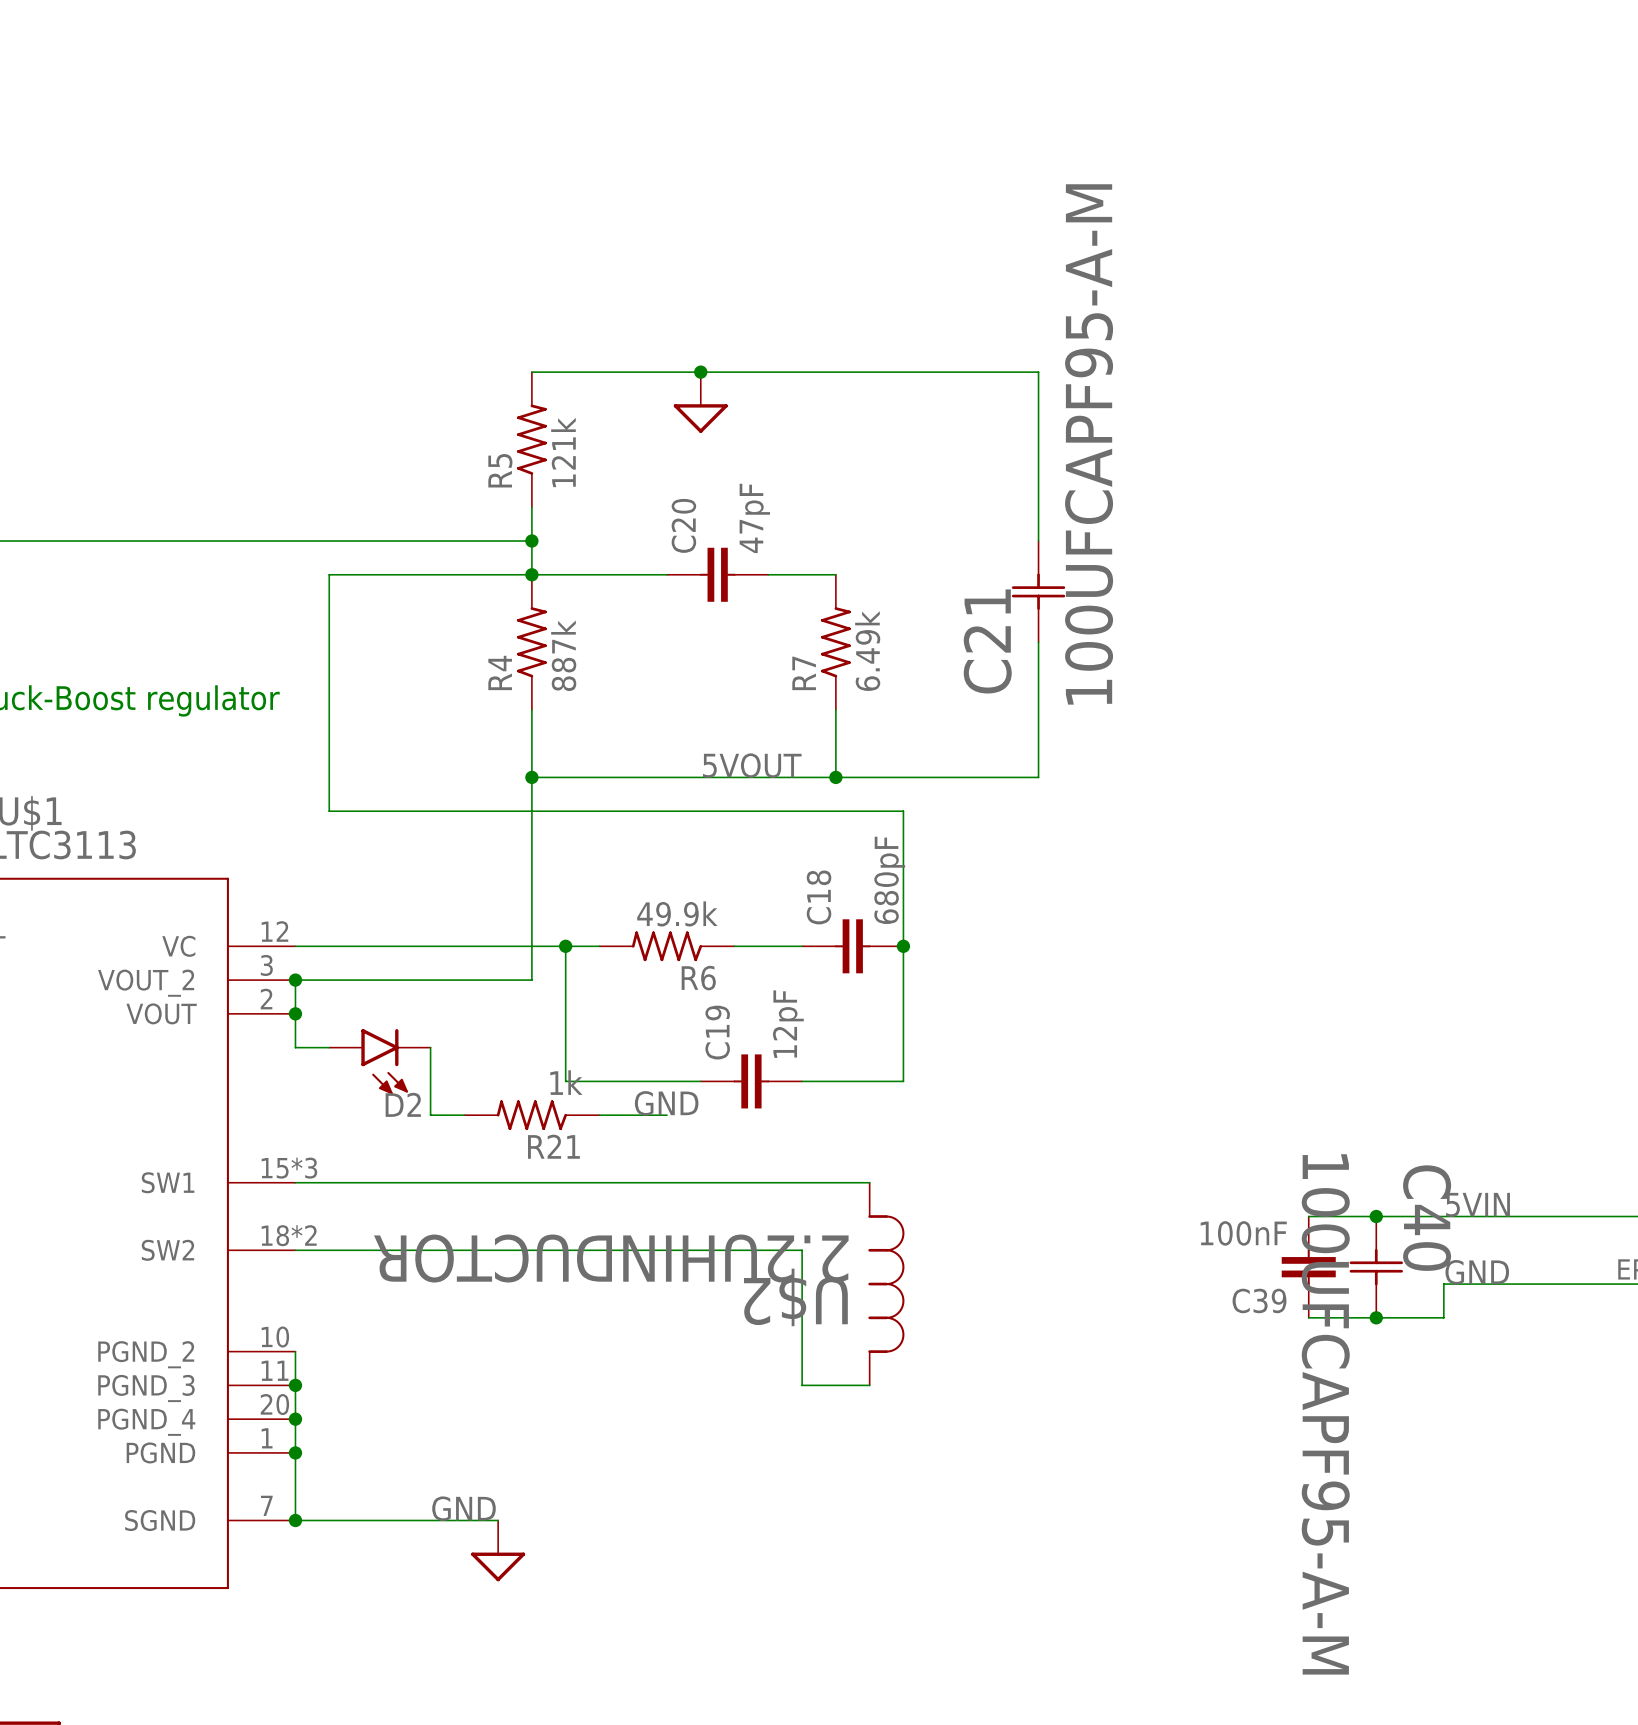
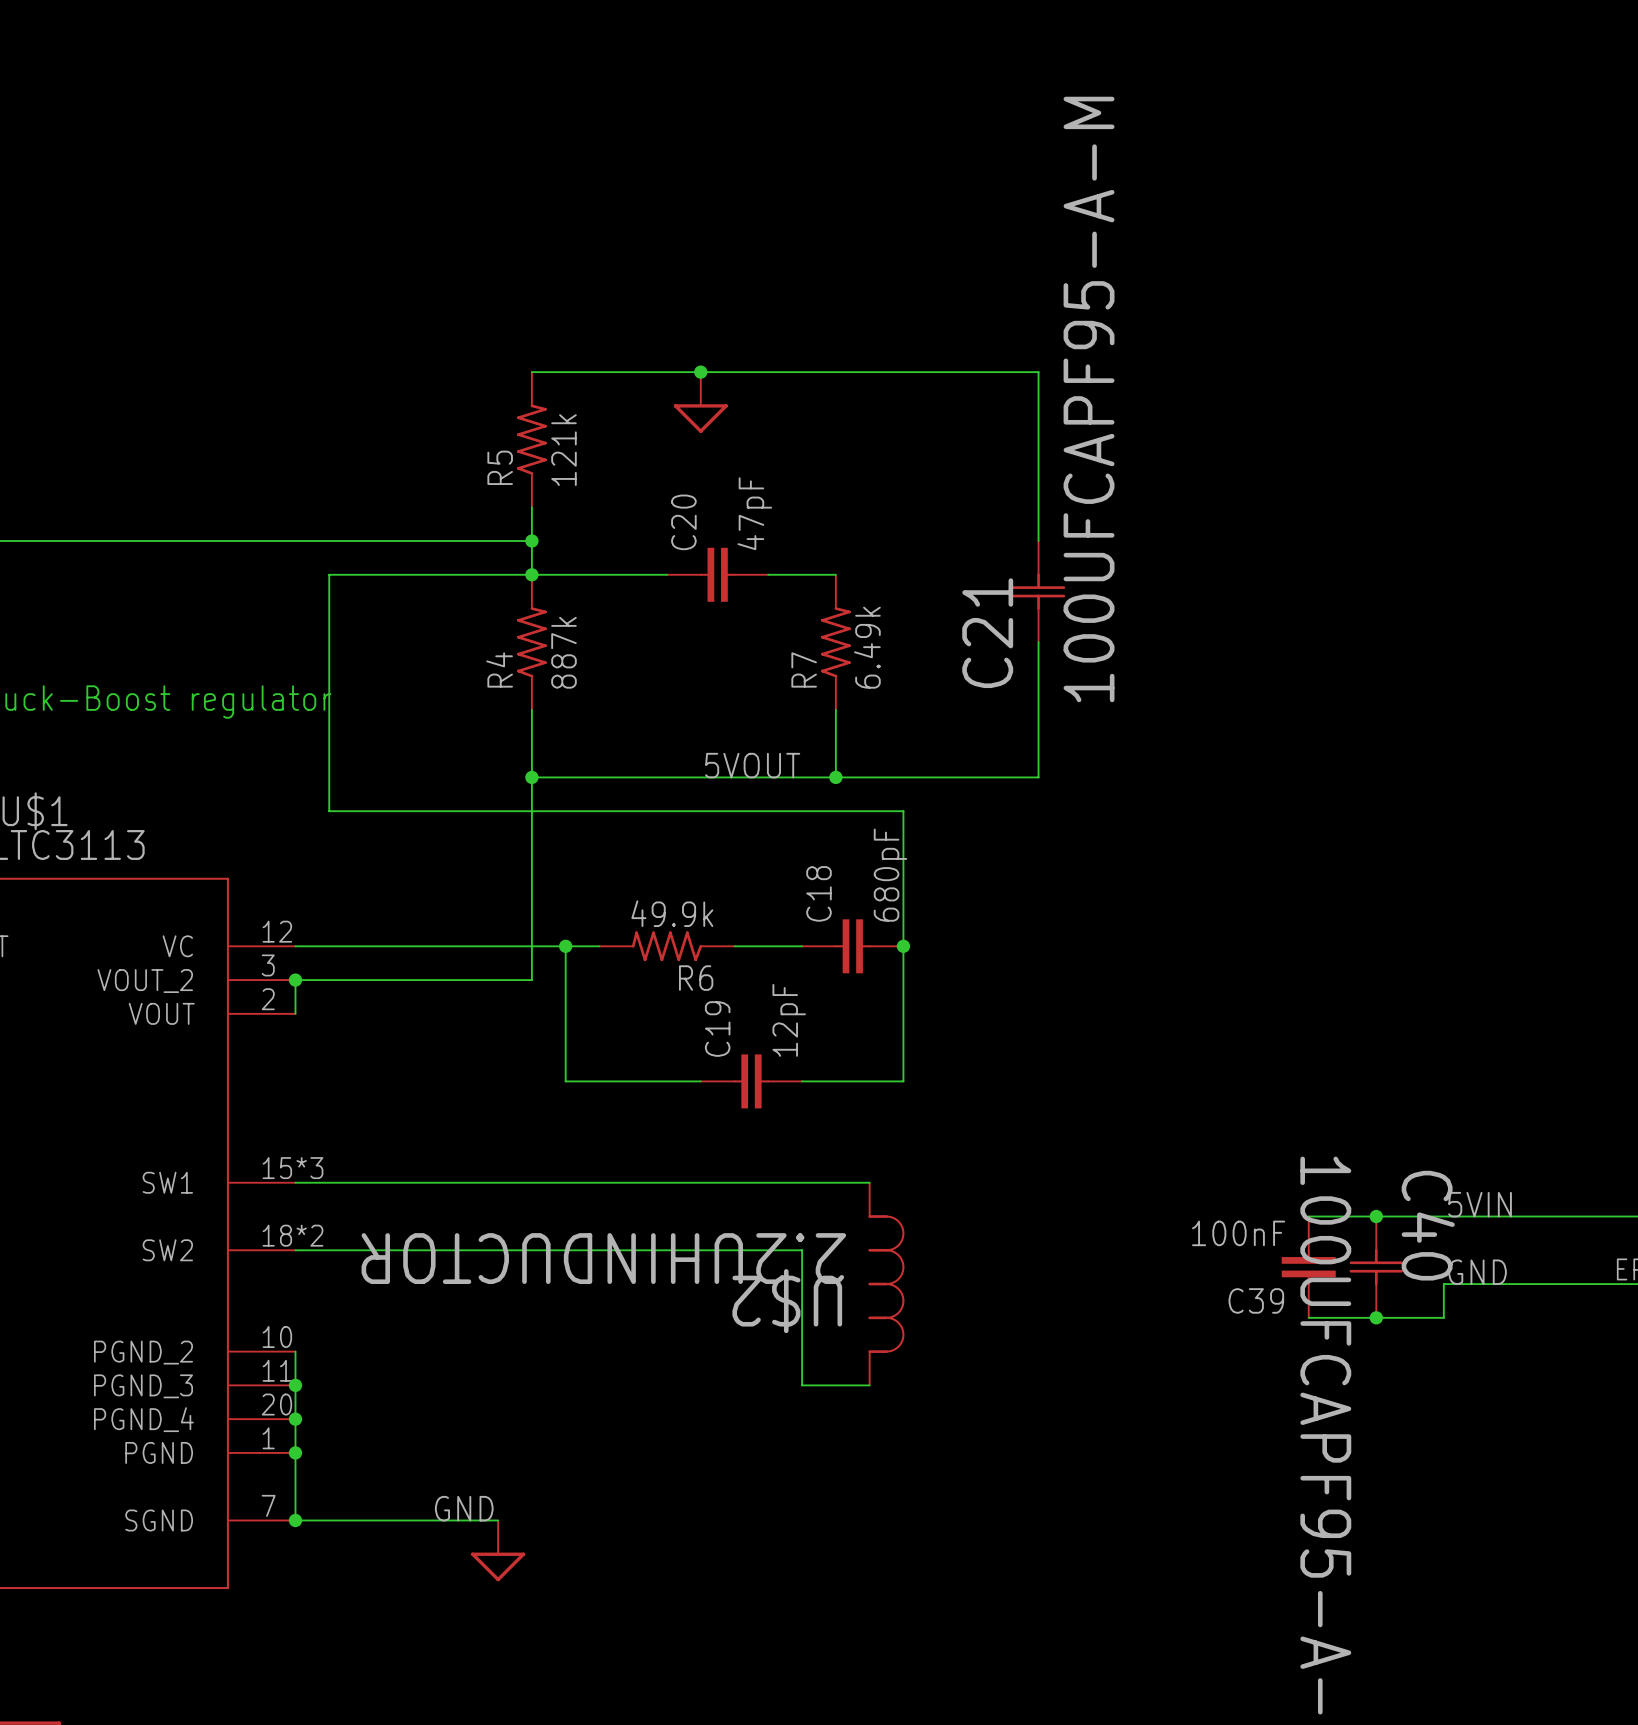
wire: (295, 1013) (295, 1047) (329, 1047) -> none
junction: (295, 1013) -> none
wire: (430, 1047) (430, 1115) (464, 1115) -> none
D2: (379, 1061) -> none
label: GND (666, 1103) -> none
R21: 1k (531, 1115) -> none
wire: (599, 1115) (667, 1115) -> none

